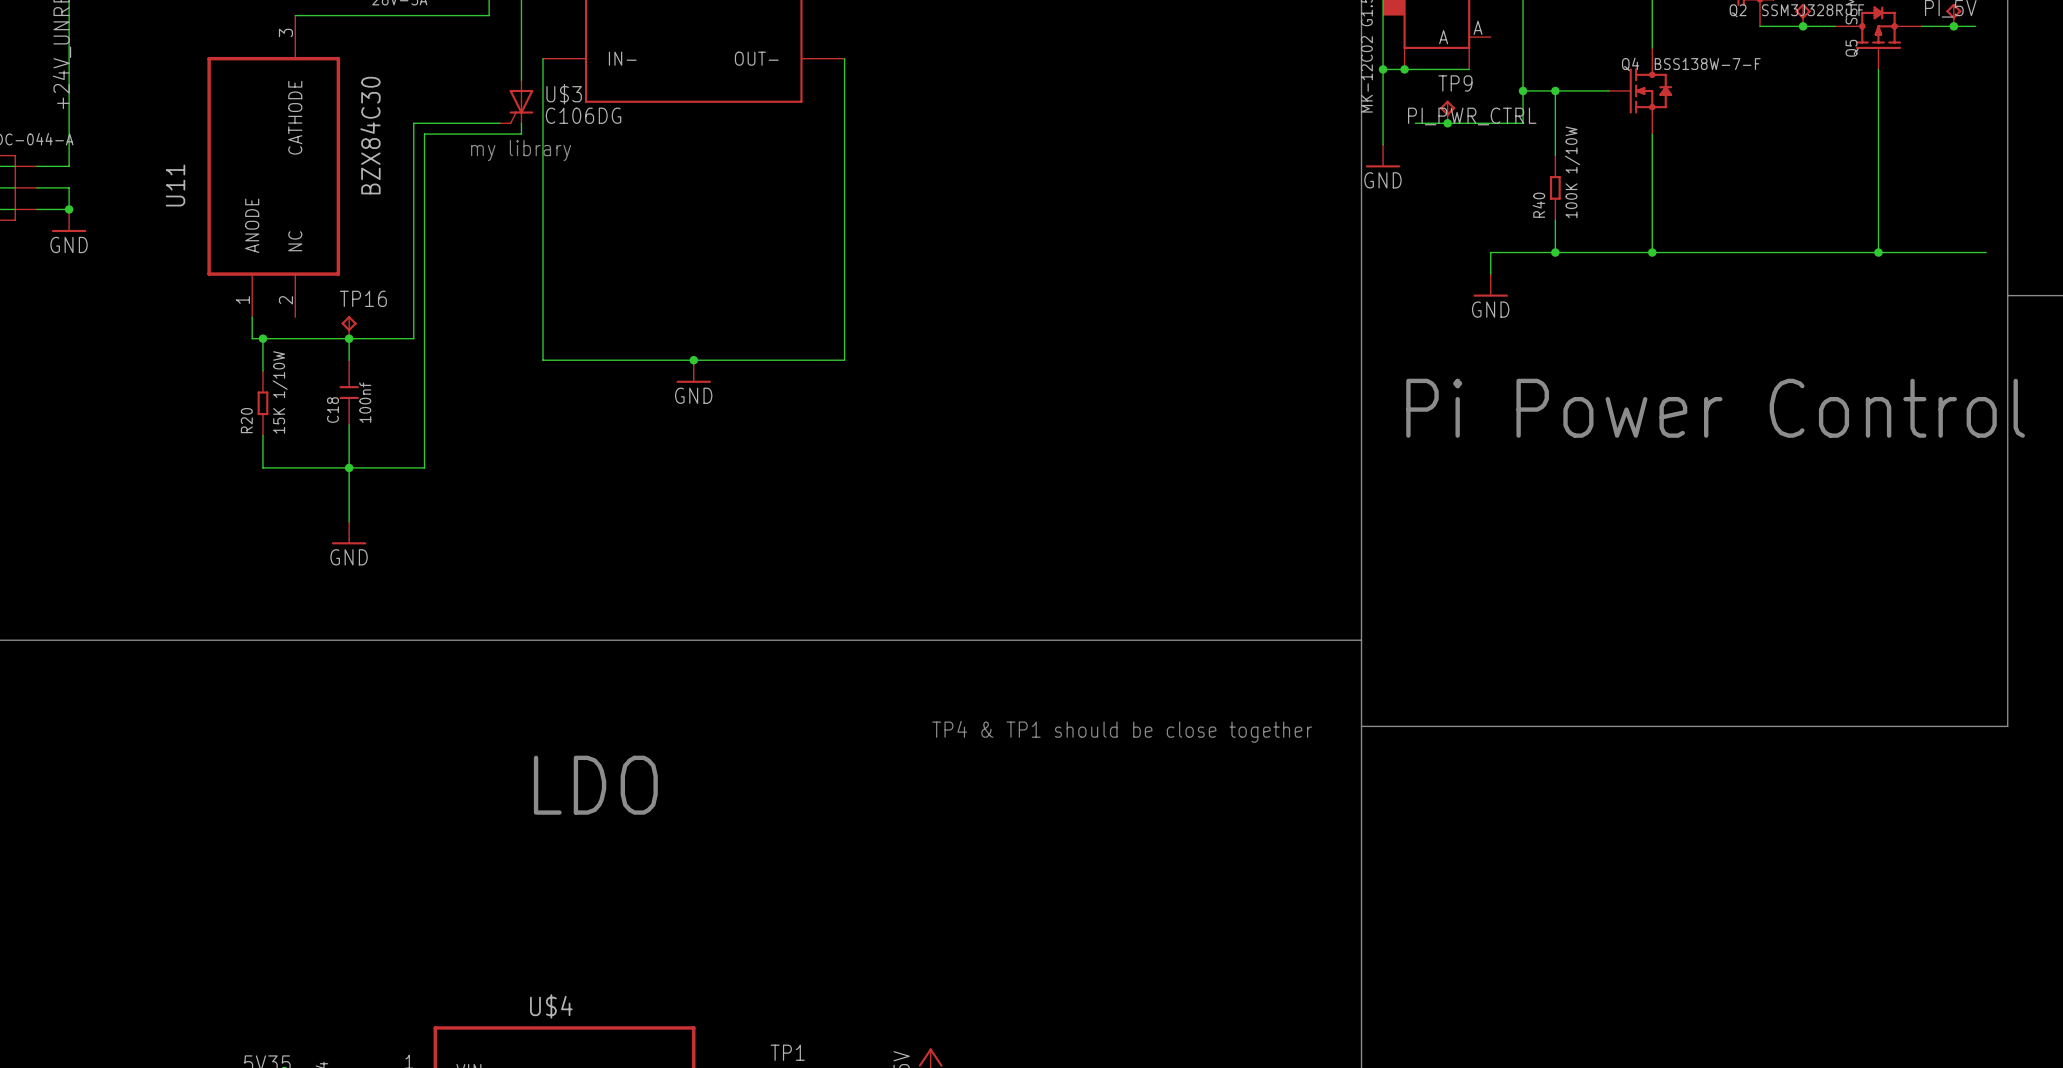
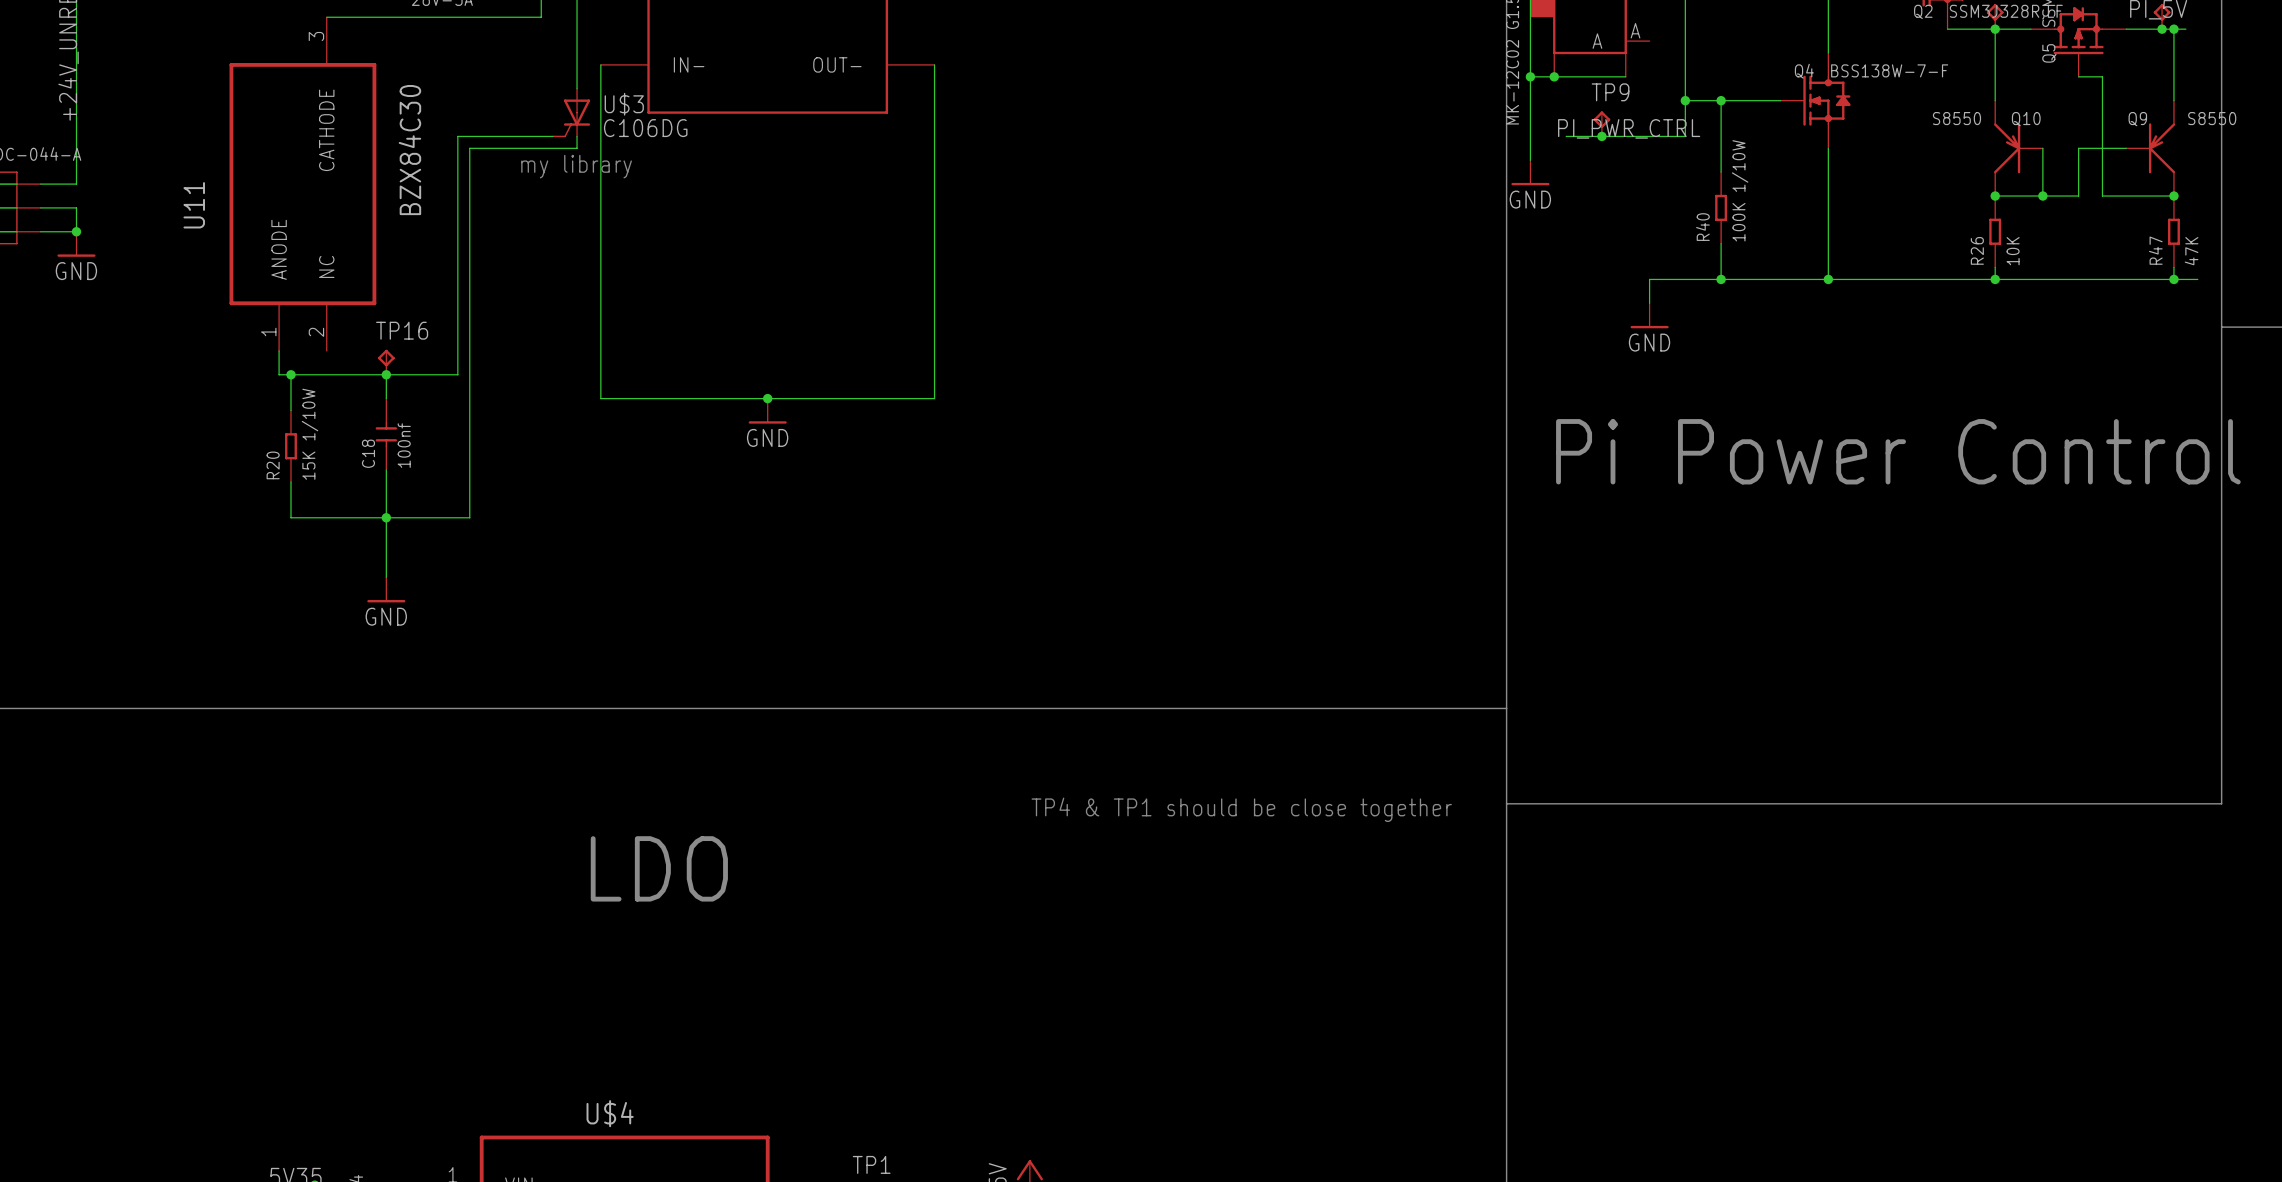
wire: none -> (1995, 29) (1995, 100)
wire: none -> (2173, 29) (2173, 100)
junction: none -> (2173, 29)
wire: (1878, 69) (1878, 134) -> (2126, 148) (2078, 148)
wire: none -> (2078, 76) (2102, 76) (2102, 196) (2173, 196)
Q10: none -> S8550 (2018, 148)
wire: none -> (2042, 148) (2042, 196)
Q9: none -> S8550 (2150, 148)
junction: none -> (1995, 196)
junction: none -> (2042, 196)
wire: (1878, 177) (1878, 252) -> (2078, 196) (1995, 196)
junction: none -> (2173, 196)
R26: none -> 10K (1995, 231)
R47: none -> 47K (2173, 231)
wire: none -> (1995, 267) (1995, 279)
wire: none -> (2173, 267) (2173, 279)
junction: none -> (1995, 279)
junction: (1878, 252) -> none
junction: none -> (2173, 279)

